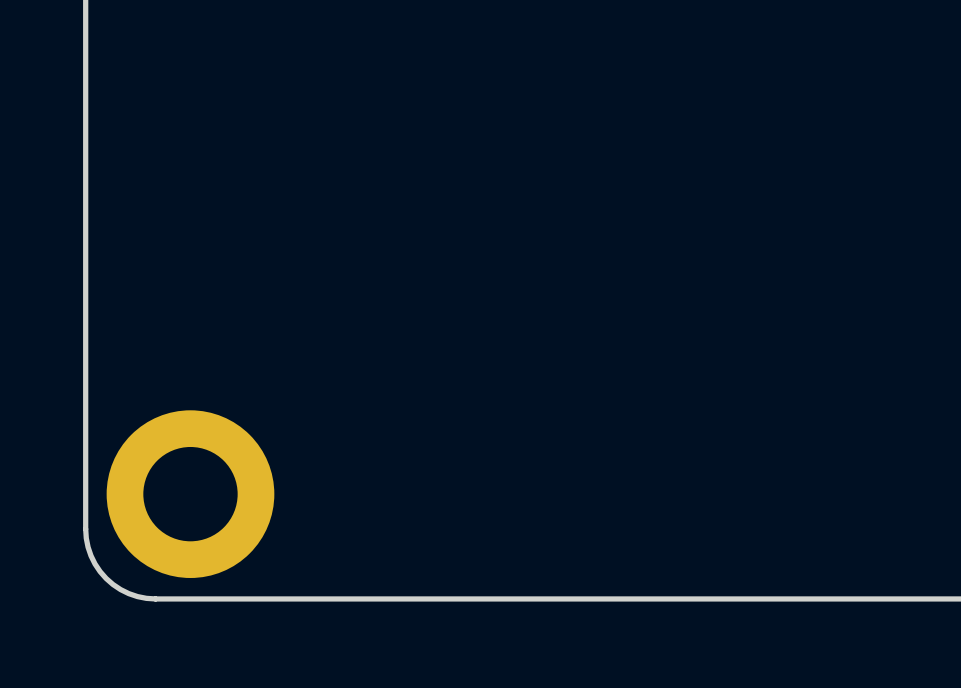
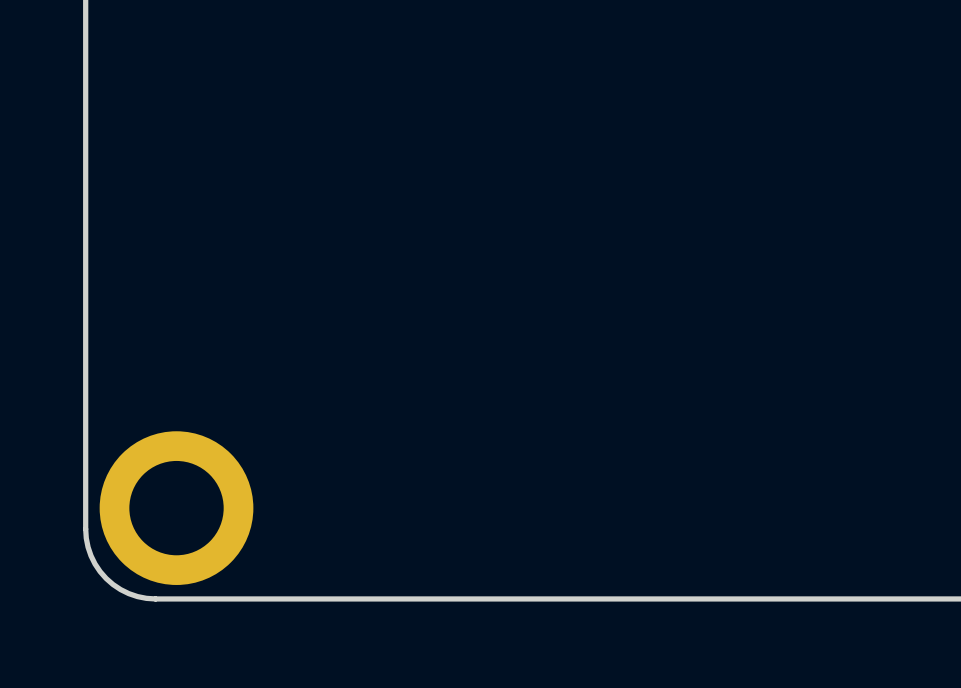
part footprint: [106, 410, 275, 578] -> [99, 431, 254, 585]

